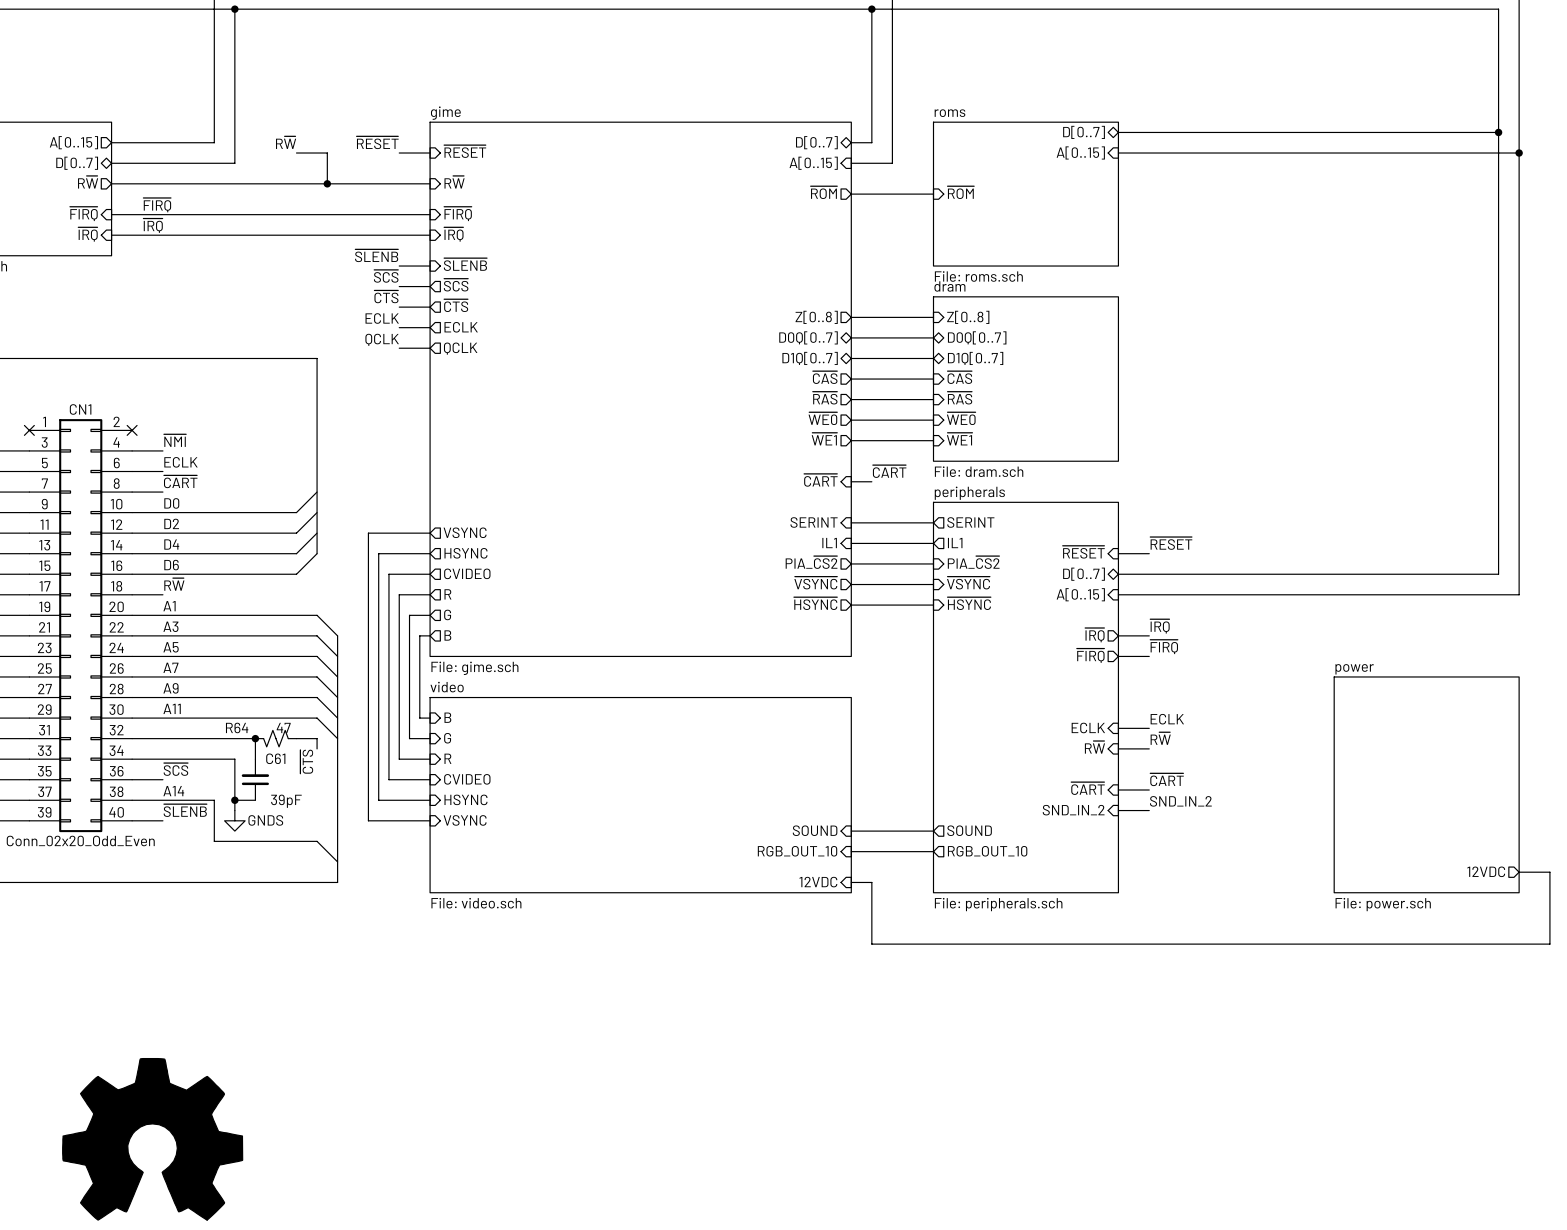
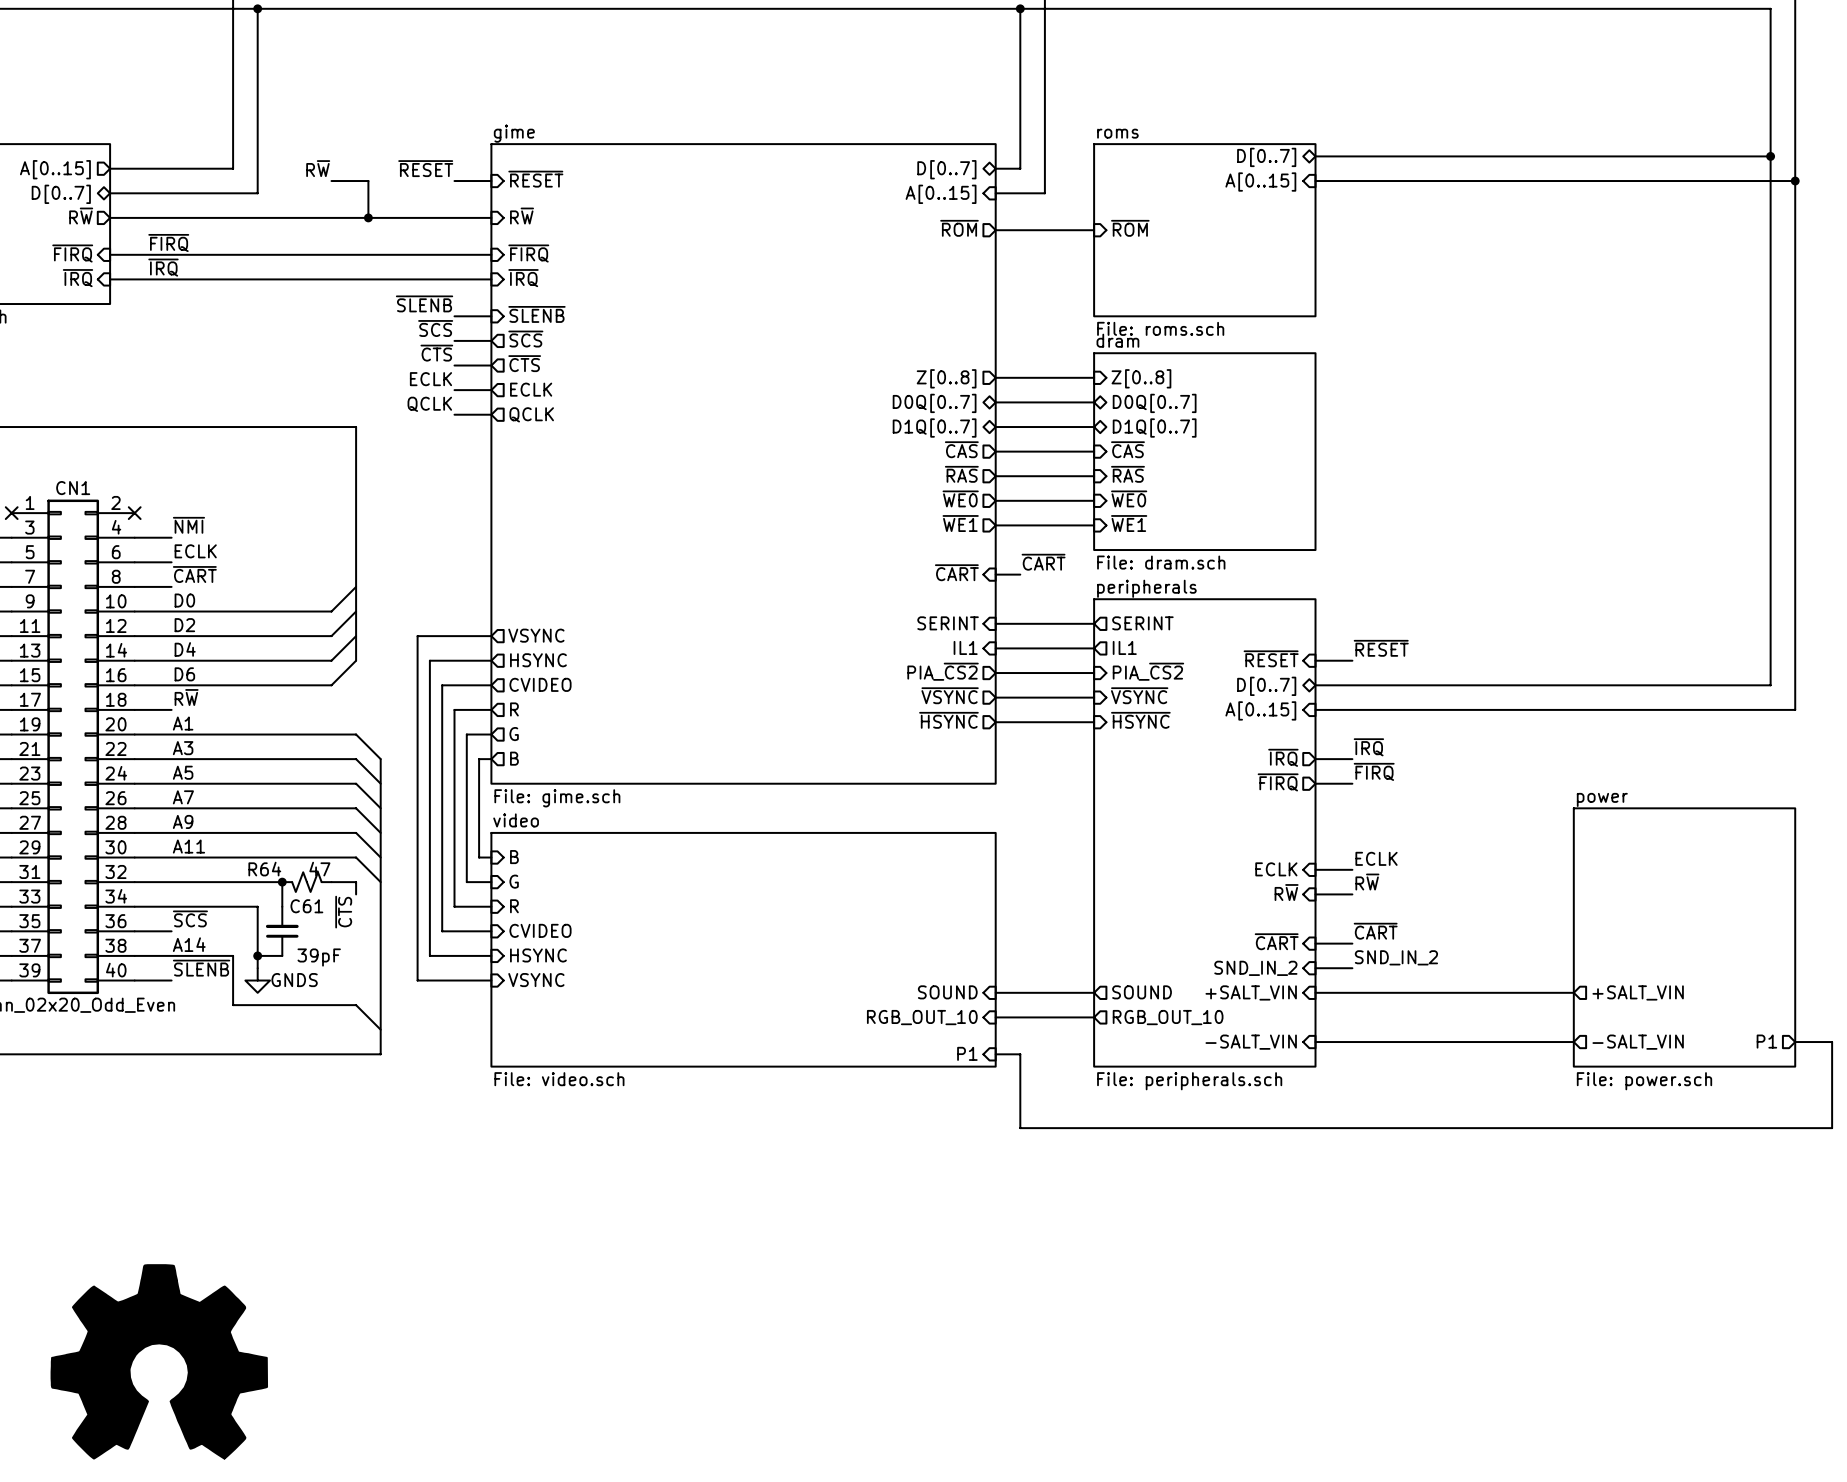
sheet pin: none -> +SALT_VIN (1251, 992)
sheet pin: none -> +SALT_VIN (1638, 992)
wire: none -> (1315, 992) (1573, 992)
sheet pin: none -> -SALT_VIN (1251, 1042)
sheet pin: none -> -SALT_VIN (1638, 1042)
sheet pin: 12VDC (1486, 871) -> P1 (1766, 1041)
wire: none -> (1315, 1042) (1573, 1042)
sheet pin: 12VDC (818, 882) -> P1 (967, 1053)

